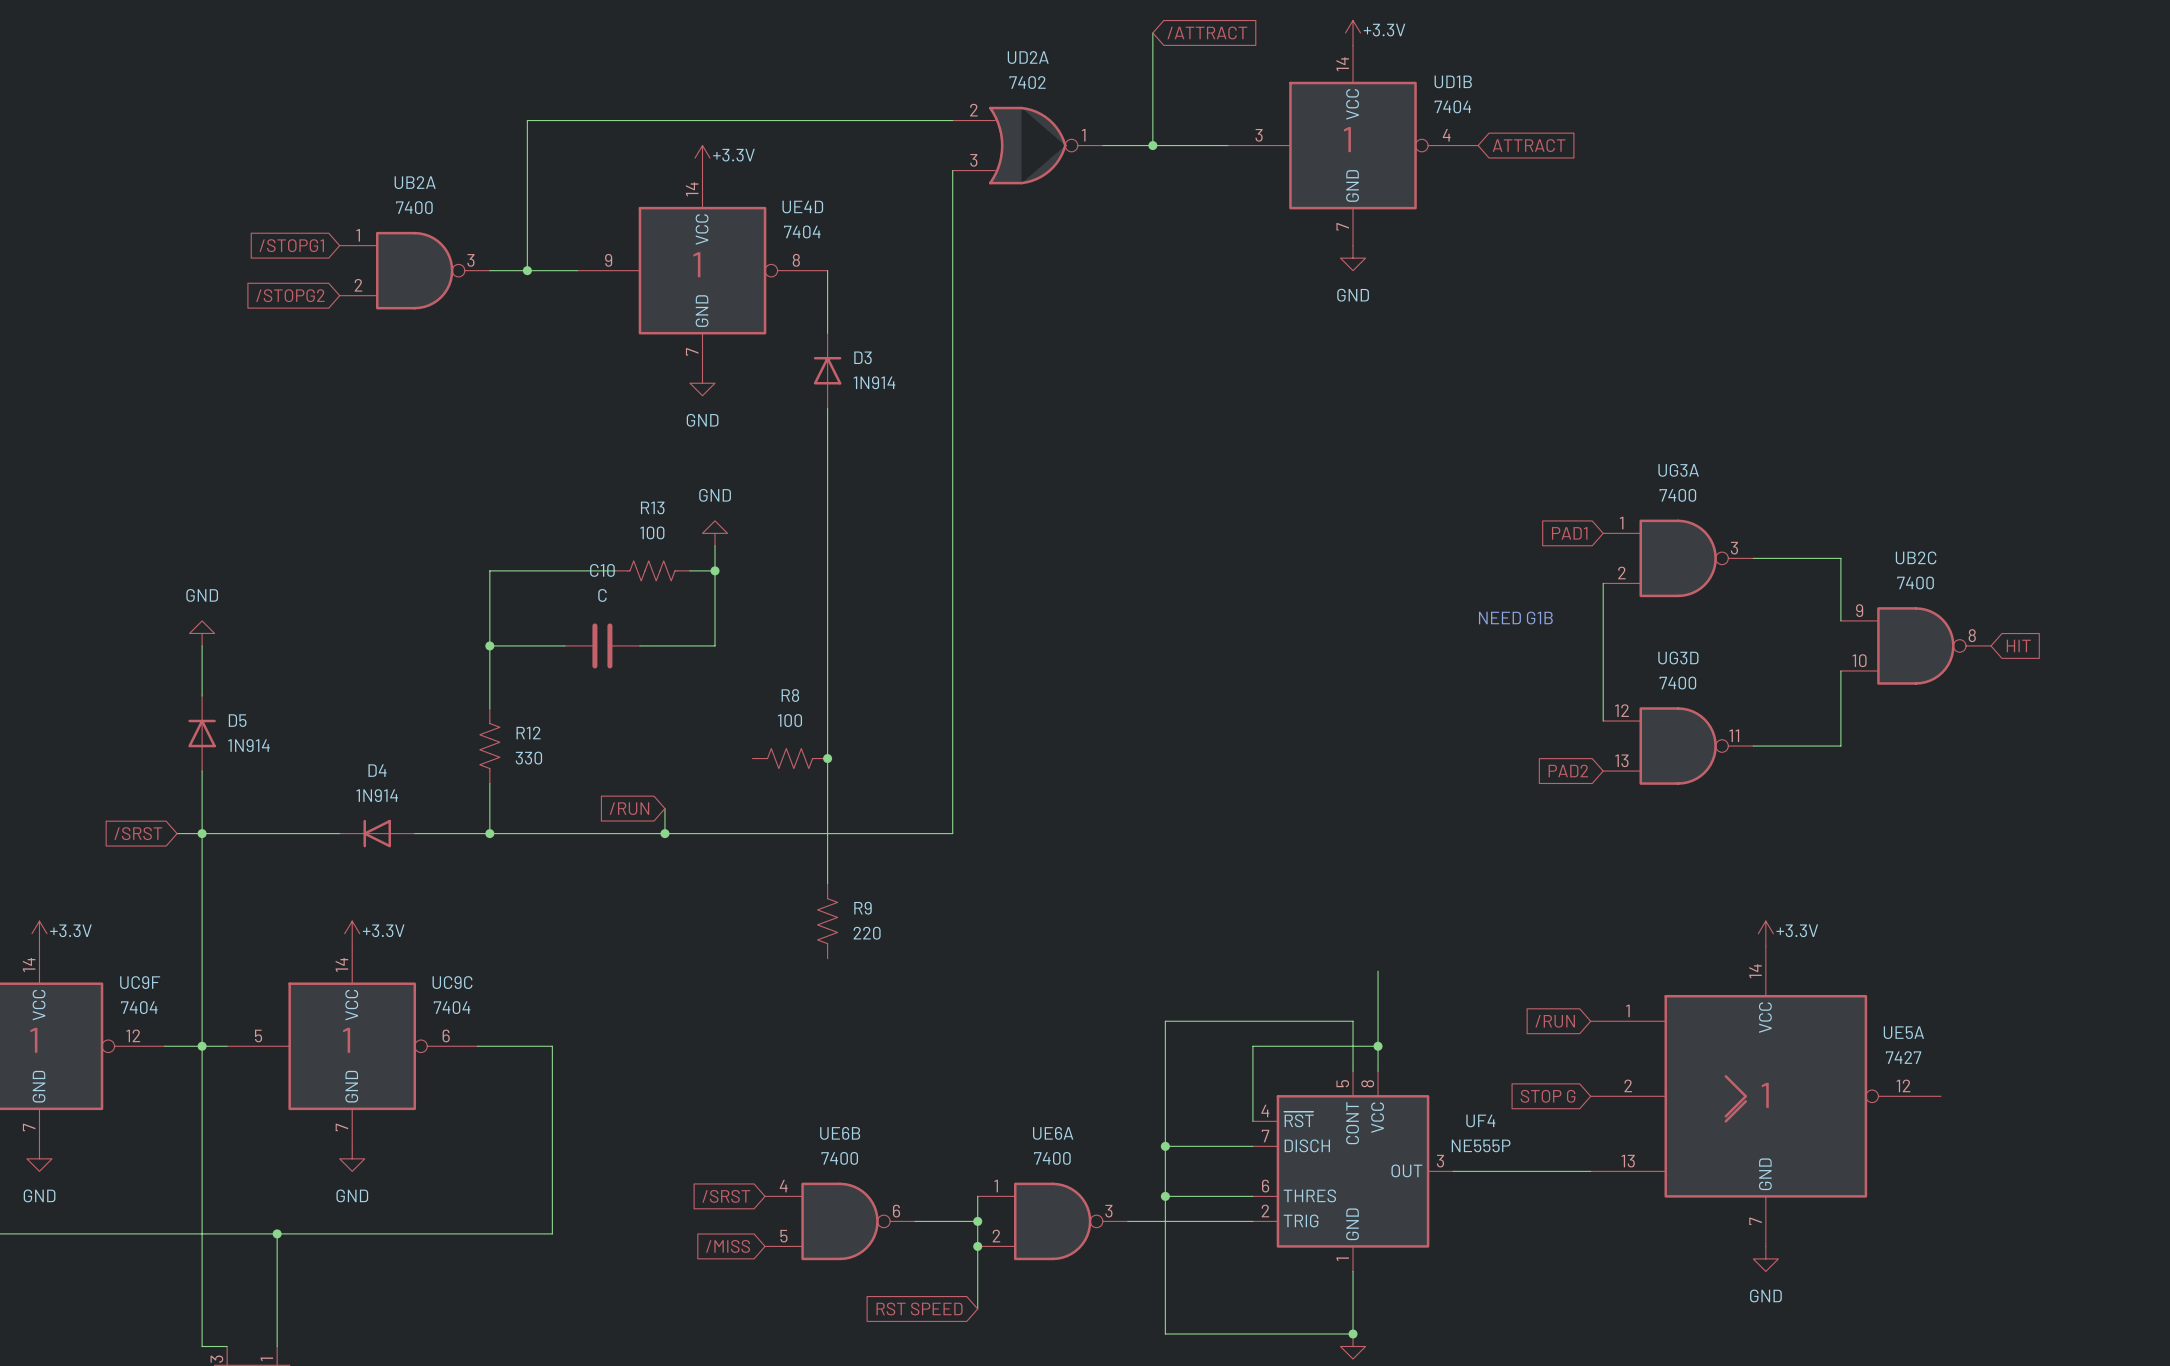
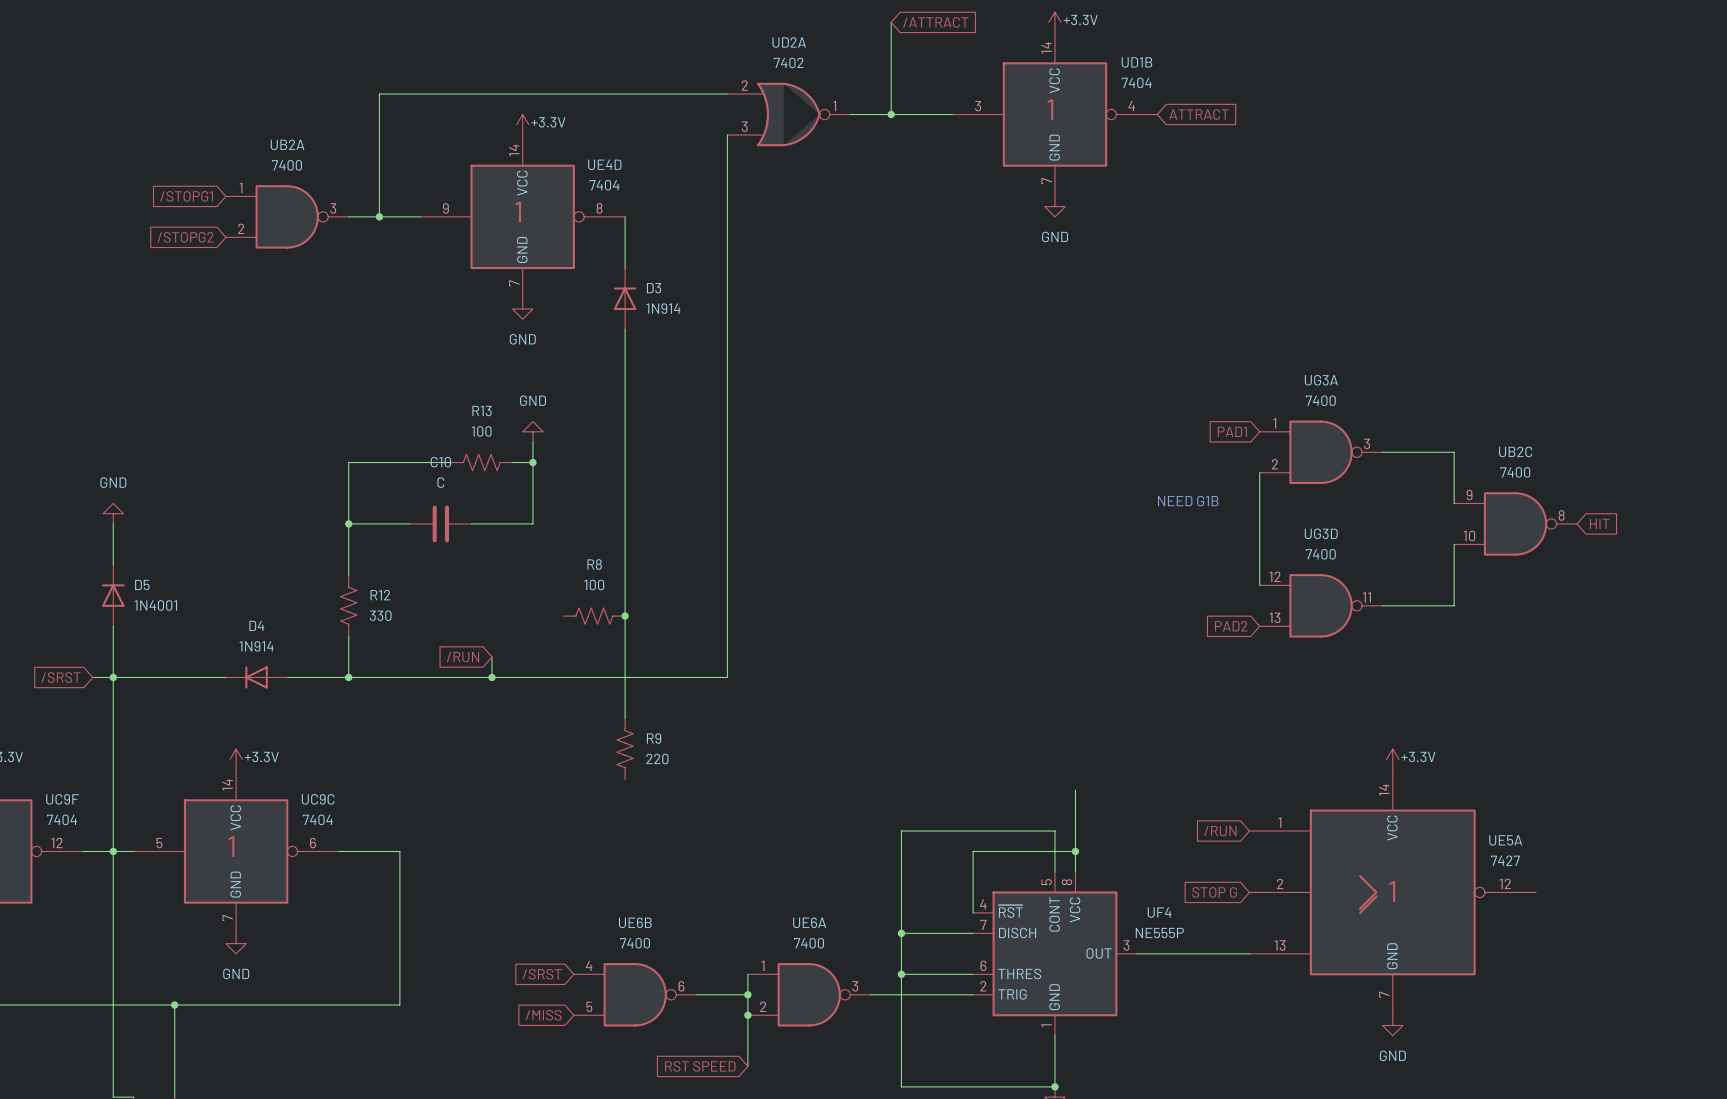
D5 value: 1N914 (248, 745) -> 1N4001 (155, 605)

